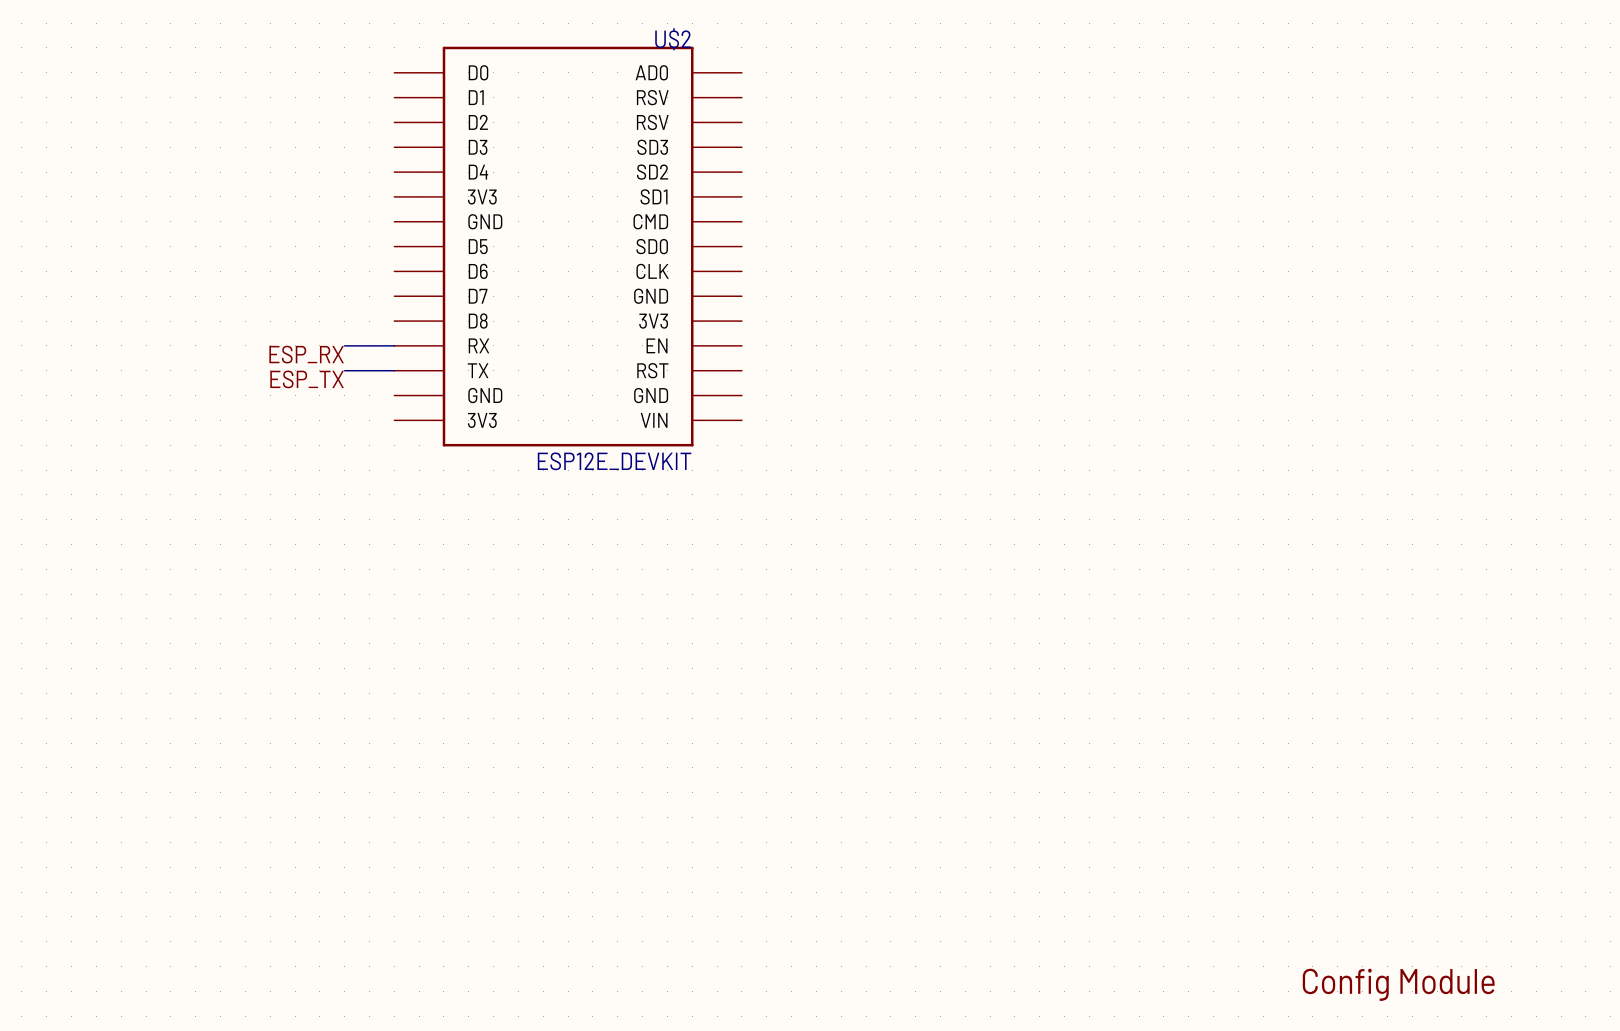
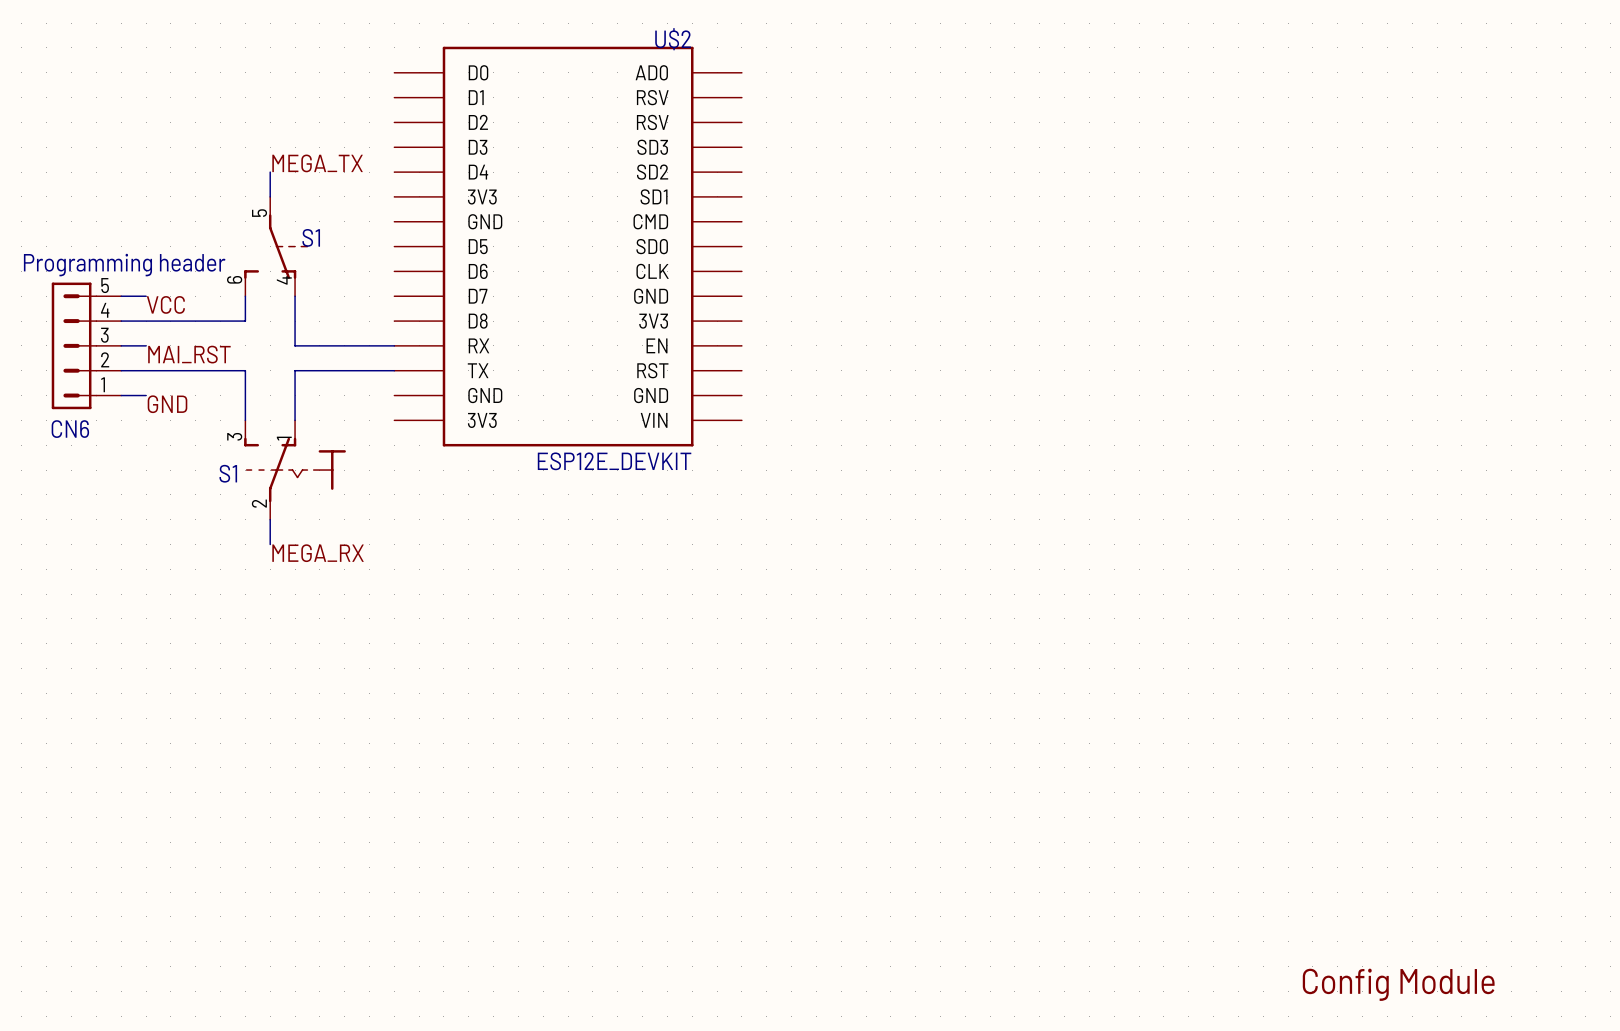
label: none -> MEGA_TX (317, 163)
wire: none -> (270, 172) (270, 196)
S1: none -> (276, 246)
text: none -> Programming header (124, 265)
wire: none -> (121, 296) (146, 296)
wire: none -> (245, 296) (245, 321) (121, 321)
wire: none -> (295, 296) (295, 345) (344, 345)
label: none -> VCC (165, 304)
CN6: none -> (86, 345)
wire: none -> (121, 345) (146, 345)
label: none -> MAI_RST (189, 354)
label: ESP_RX (306, 354) -> none
wire: none -> (121, 370) (245, 370) (245, 420)
wire: none -> (344, 370) (295, 370) (295, 420)
label: ESP_TX (307, 379) -> none
wire: none -> (121, 395) (146, 395)
label: none -> GND (167, 404)
S1: none -> (295, 470)
wire: none -> (270, 519) (270, 544)
label: none -> MEGA_RX (318, 553)

